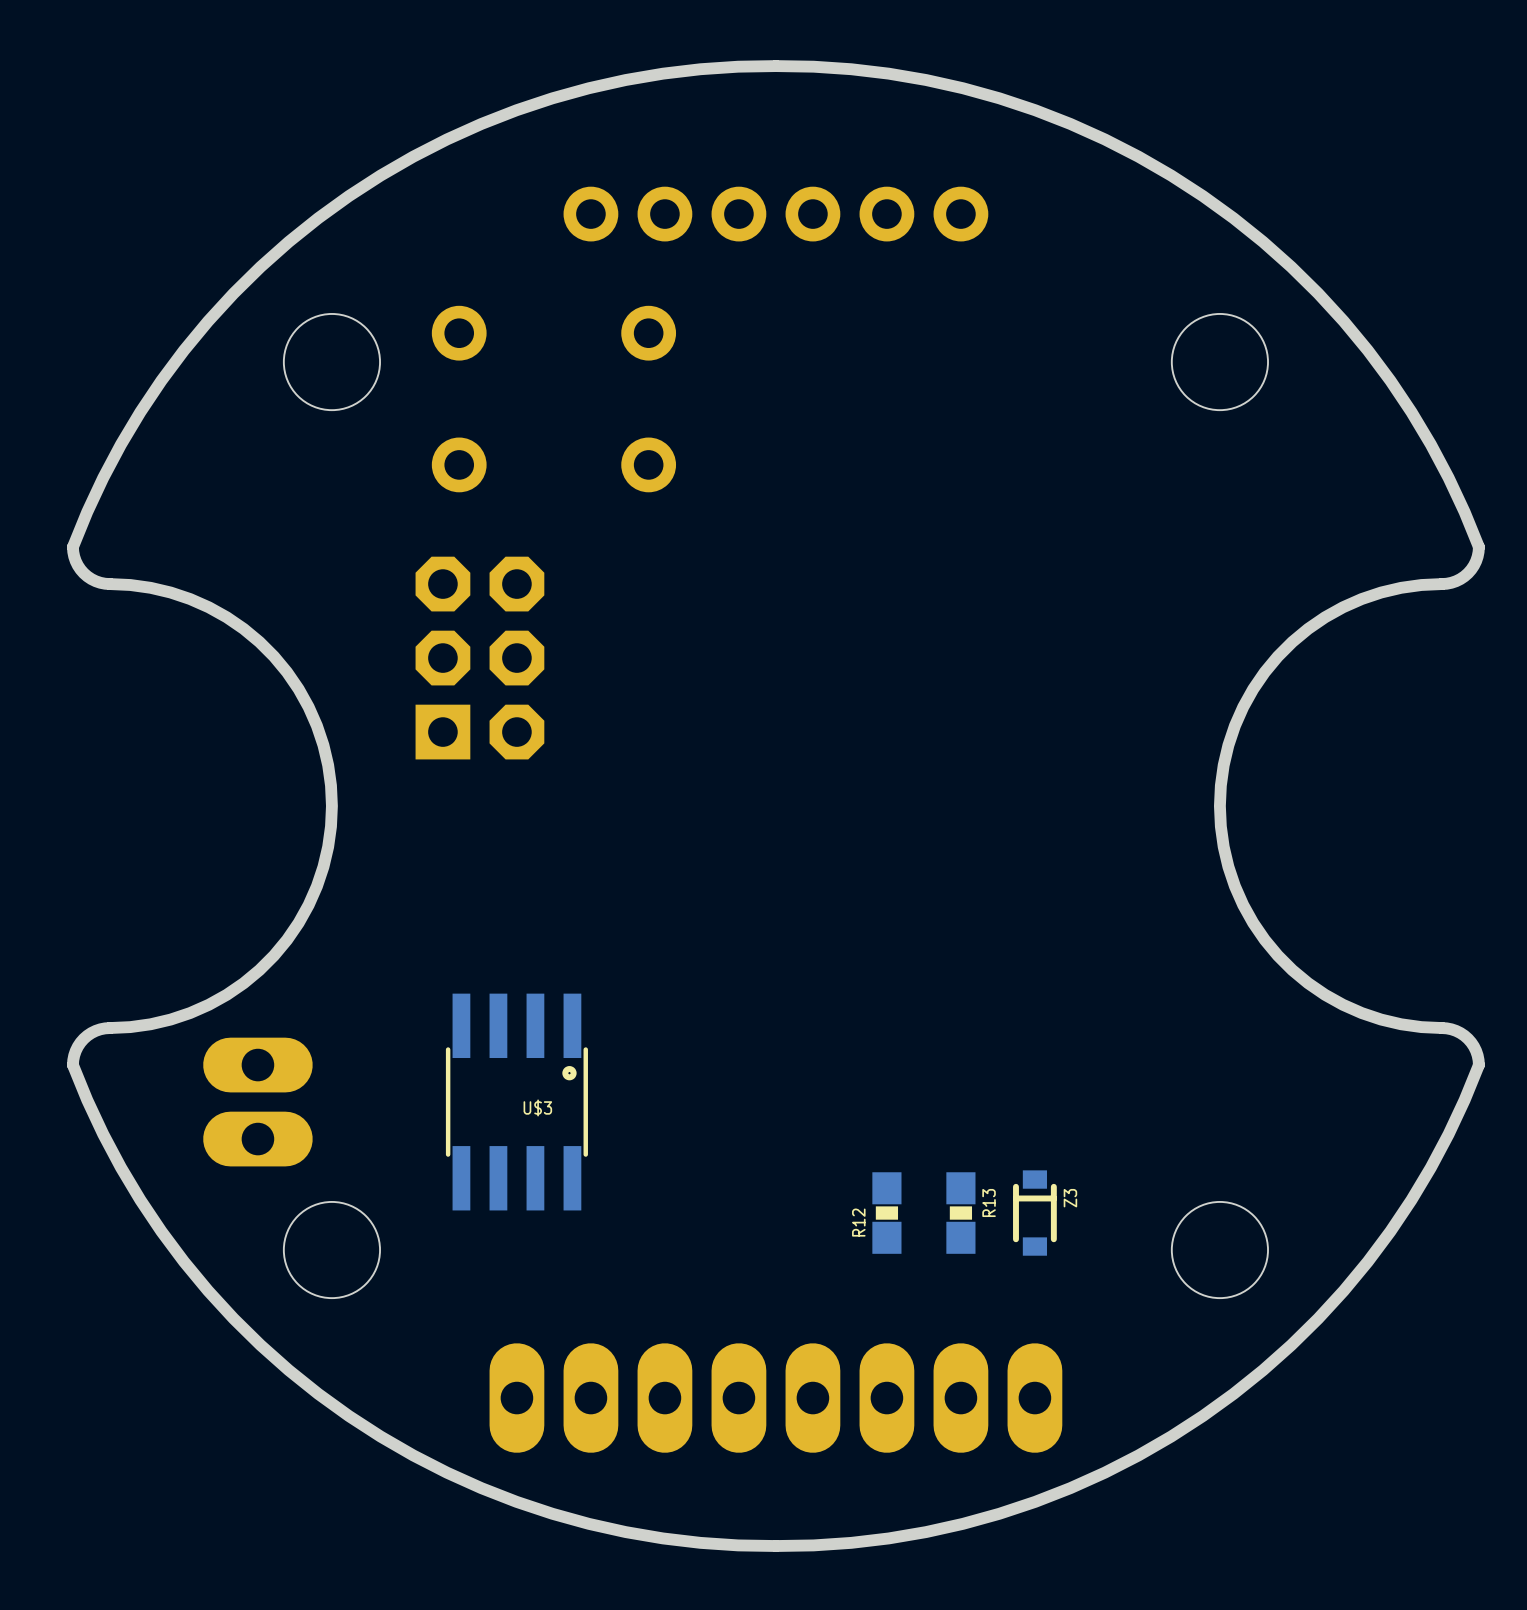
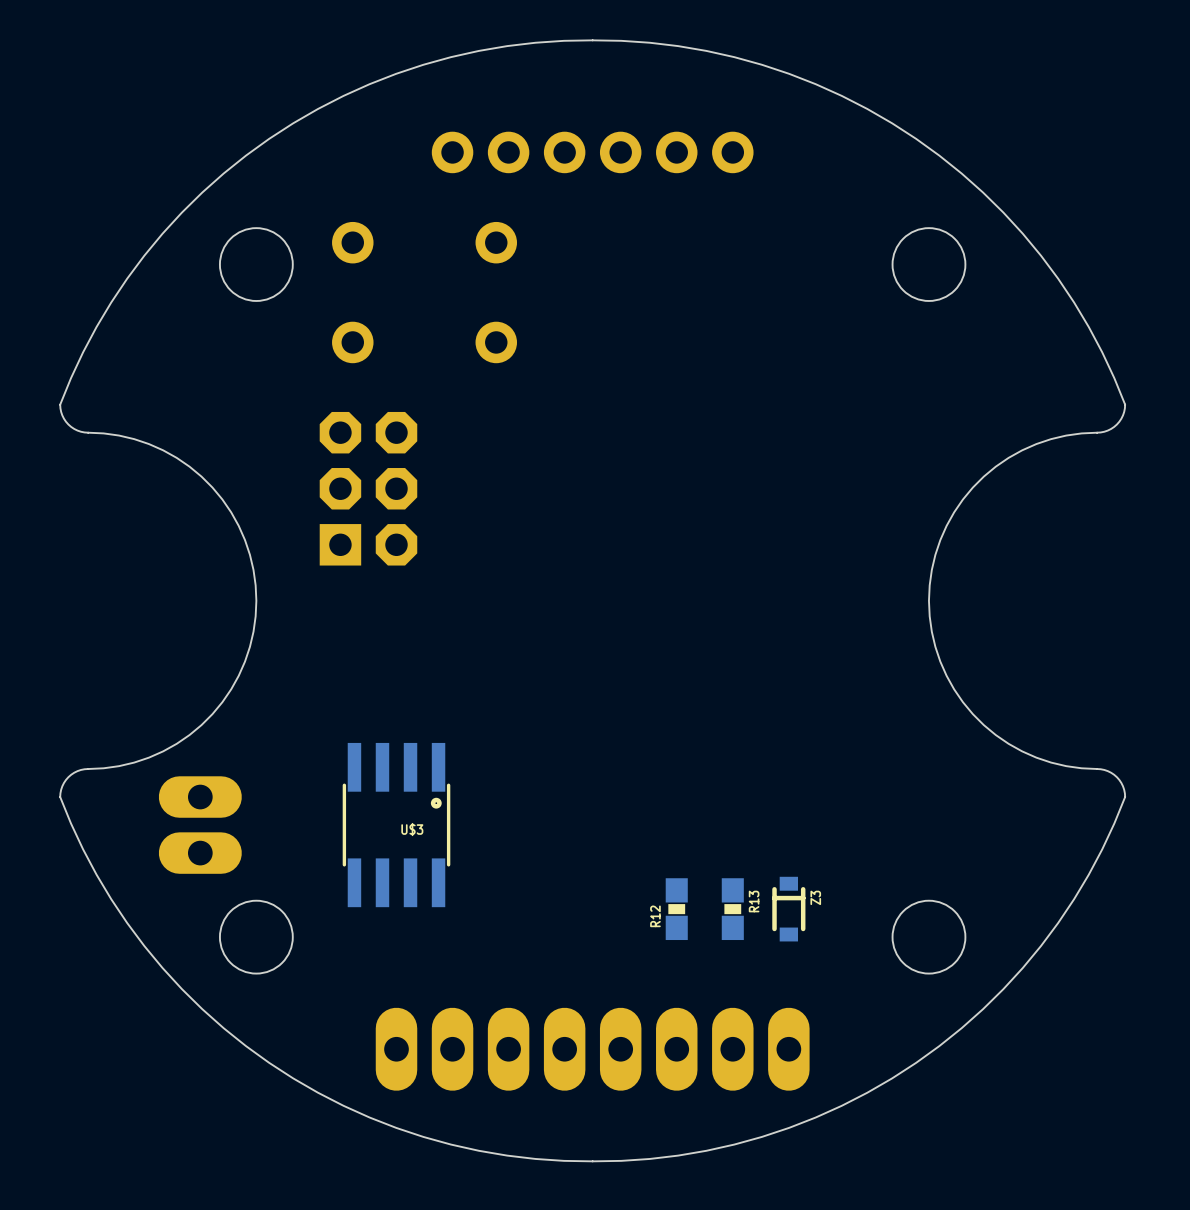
board edge width: thick (775, 66) (738, 66) (662, 73) (625, 80) (552, 98) (481, 123) (446, 139) (413, 156) (348, 196) (288, 241) (260, 266) (233, 293) (183, 350) (140, 412) (120, 444) (103, 477) (72, 547) (77, 565) (91, 579) (105, 583) (150, 587) (190, 599) (226, 617) (259, 641) (287, 672) (308, 707) (323, 745) (330, 785) (330, 826) (323, 866) (316, 886) (298, 922) (274, 955) (243, 983) (208, 1004) (190, 1013) (150, 1024) (95, 1030) (83, 1038) (75, 1050) (72, 1065) (103, 1134) (120, 1167) (161, 1231) (208, 1290) (233, 1318) (288, 1370) (348, 1415) (413, 1455) (446, 1472) (481, 1488) (552, 1513) (625, 1532) (700, 1542) (775, 1546) (813, 1545) (888, 1538) (926, 1532) (999, 1513) (1070, 1488) (1104, 1472) (1138, 1455) (1202, 1415) (1263, 1370) (1291, 1345) (1318, 1318) (1367, 1261) (1411, 1200) (1430, 1167) (1448, 1134) (1478, 1065) (1473, 1046) (1460, 1033) (1446, 1028) (1401, 1024) (1361, 1013) (1325, 994) (1292, 970) (1264, 939) (1243, 905) (1228, 866) (1220, 826) (1220, 785) (1228, 745) (1234, 725) (1253, 689) (1277, 656) (1308, 628) (1342, 607) (1361, 599) (1401, 587) (1456, 581) (1468, 573) (1476, 561) (1478, 547) (1448, 477) (1430, 444) (1390, 380) (1343, 321) (1318, 293) (1263, 241) (1202, 196) (1138, 156) (1104, 139) (1070, 123) (999, 98) (926, 80) (851, 69) (775, 66) -> thin (592, 40) (507, 46) (423, 64) (343, 95) (269, 138) (202, 192) (144, 255) (96, 326) (60, 404) (63, 418) (74, 428) (84, 432) (119, 435) (148, 444) (176, 457) (201, 476) (222, 499) (238, 525) (249, 554) (255, 585) (255, 616) (249, 646) (231, 689) (212, 714) (189, 735) (163, 751) (119, 766) (77, 771) (68, 777) (62, 786) (60, 797) (83, 849) (127, 923) (162, 968) (223, 1028) (269, 1062) (343, 1105) (423, 1136) (478, 1150) (535, 1158) (592, 1161) (678, 1155) (761, 1136) (841, 1105) (916, 1062) (983, 1009) (1041, 945) (1088, 874) (1125, 797) (1121, 783) (1111, 772) (1100, 769) (1066, 766) (1036, 757) (1008, 743) (983, 725) (962, 702) (946, 675) (935, 646) (929, 616) (929, 585) (935, 554) (954, 512) (972, 487) (995, 466) (1022, 450) (1066, 435) (1107, 430) (1116, 424) (1123, 415) (1125, 404) (1102, 352) (1058, 278) (1022, 233) (961, 173) (916, 138) (841, 95) (761, 64) (706, 50) (649, 42) (592, 40)

